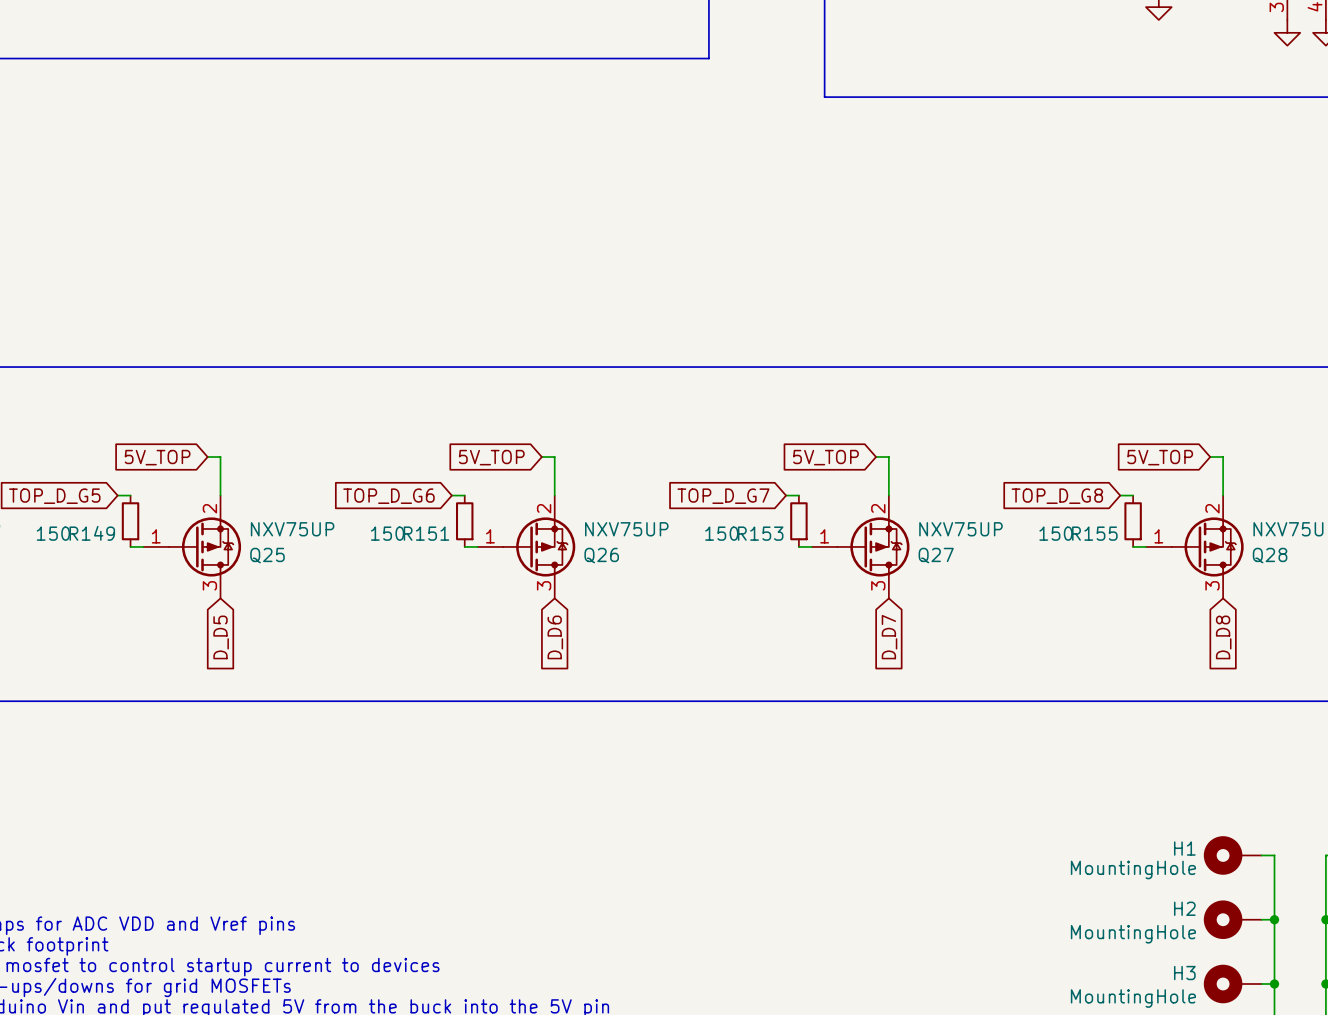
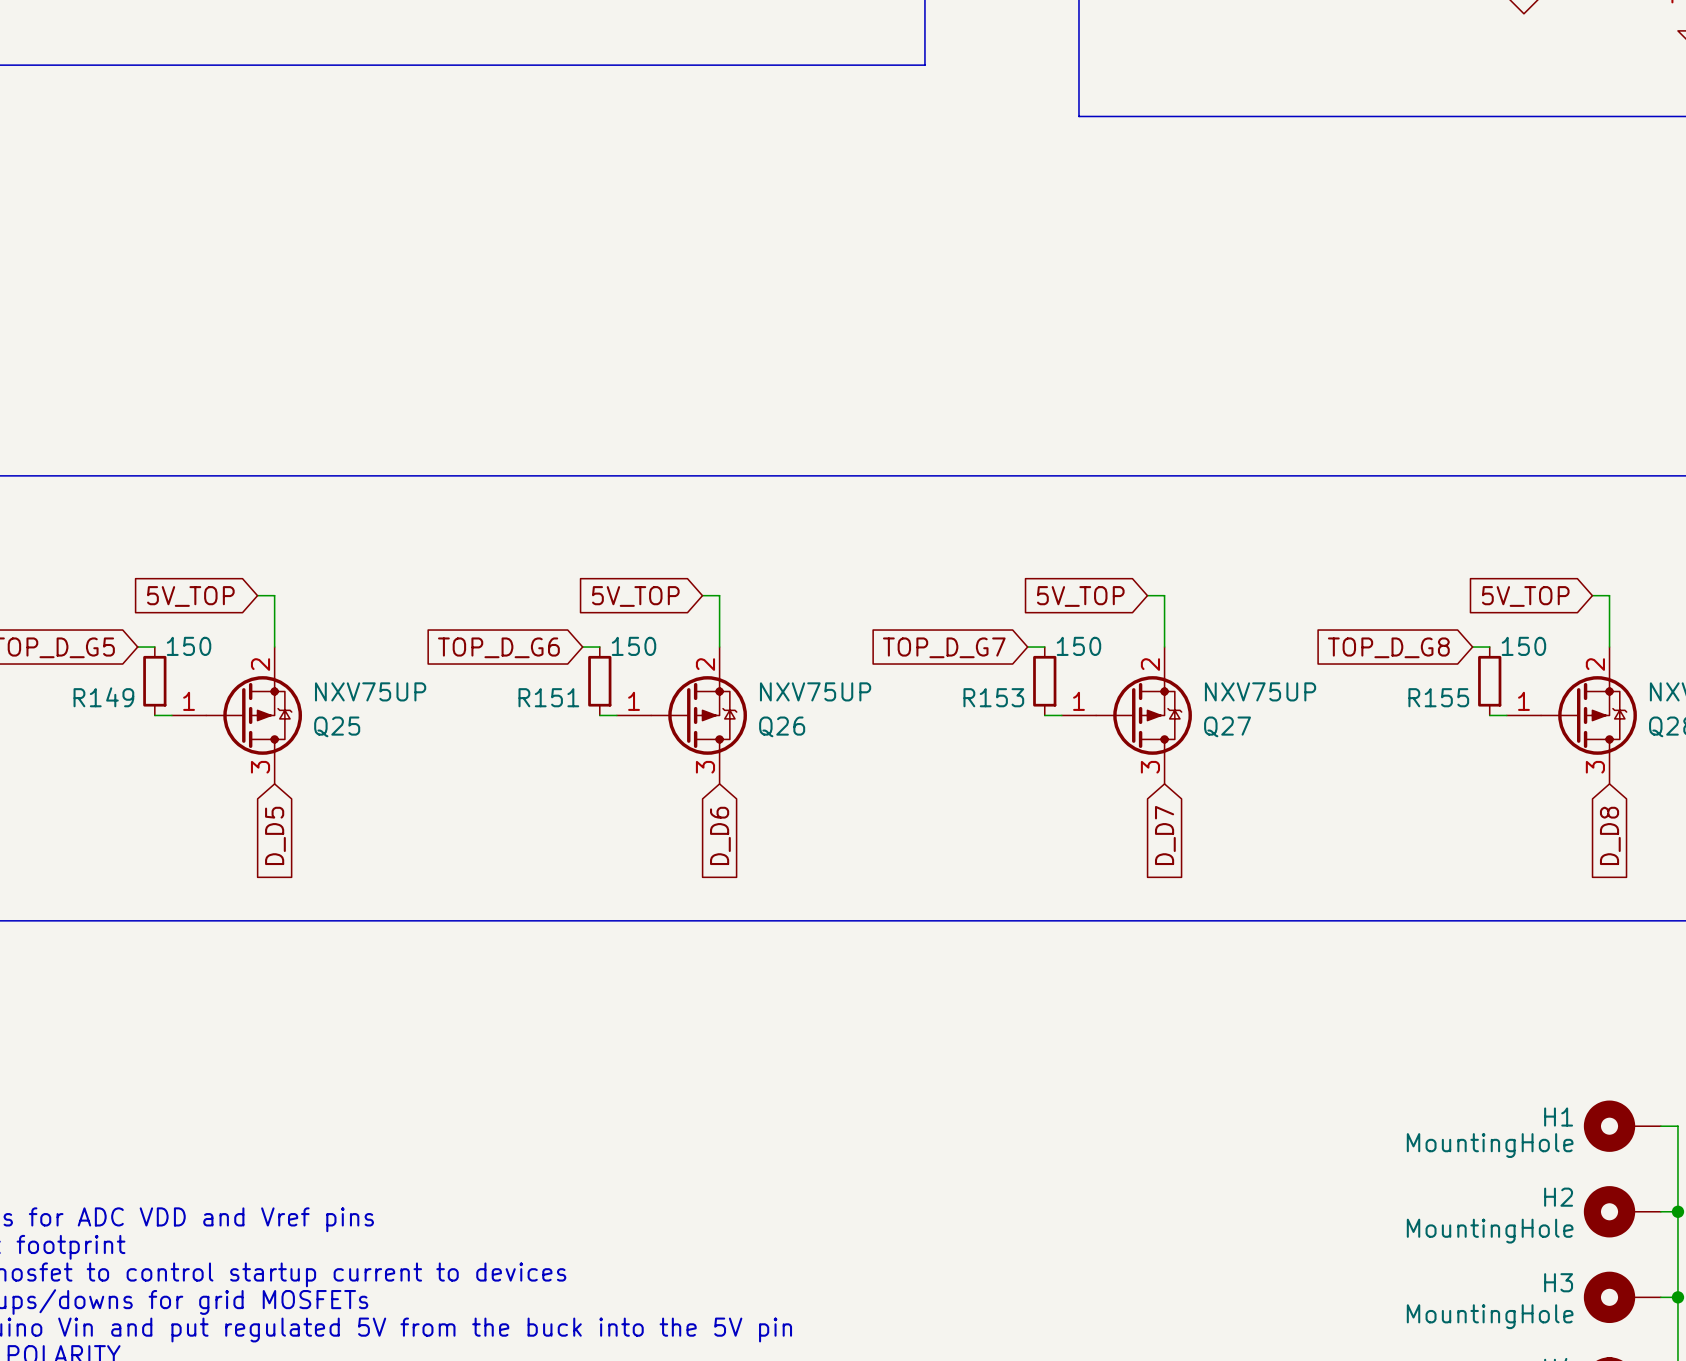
R149 value position: 150 (53, 533) -> 150 (189, 646)
R151 value position: 150 (387, 533) -> 150 (634, 646)
R153 value position: 150 (721, 533) -> 150 (1078, 646)
R155 value position: 150 (1055, 533) -> 150 (1523, 646)

